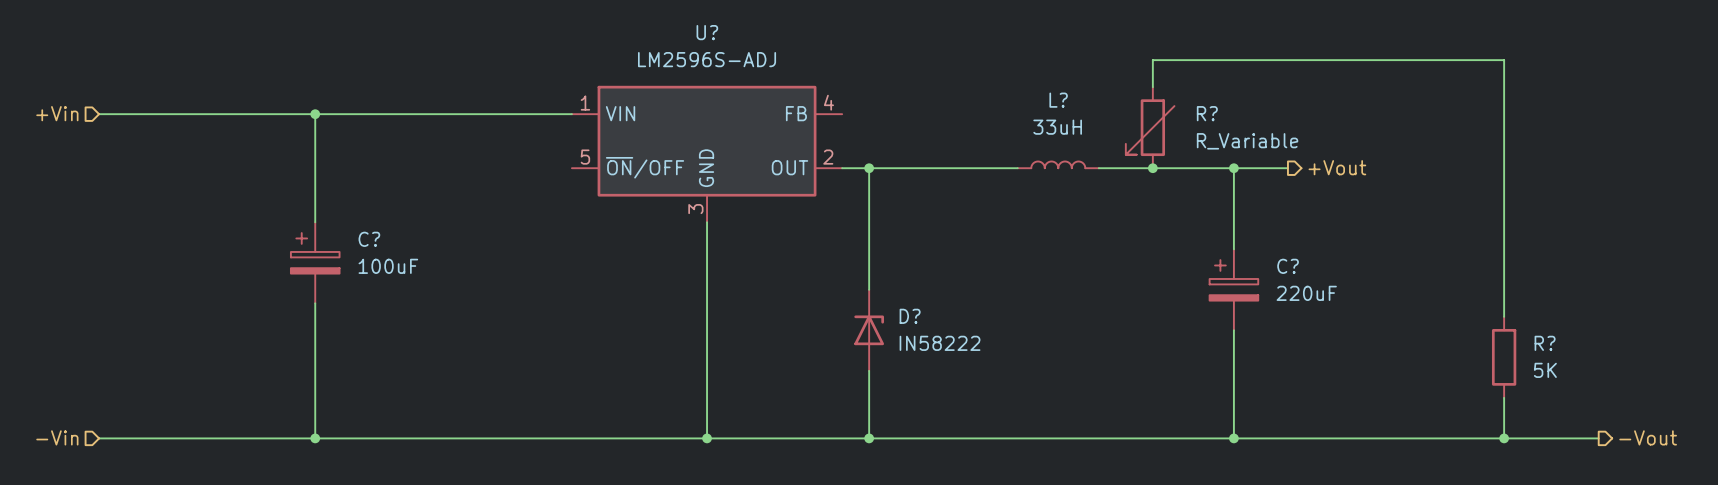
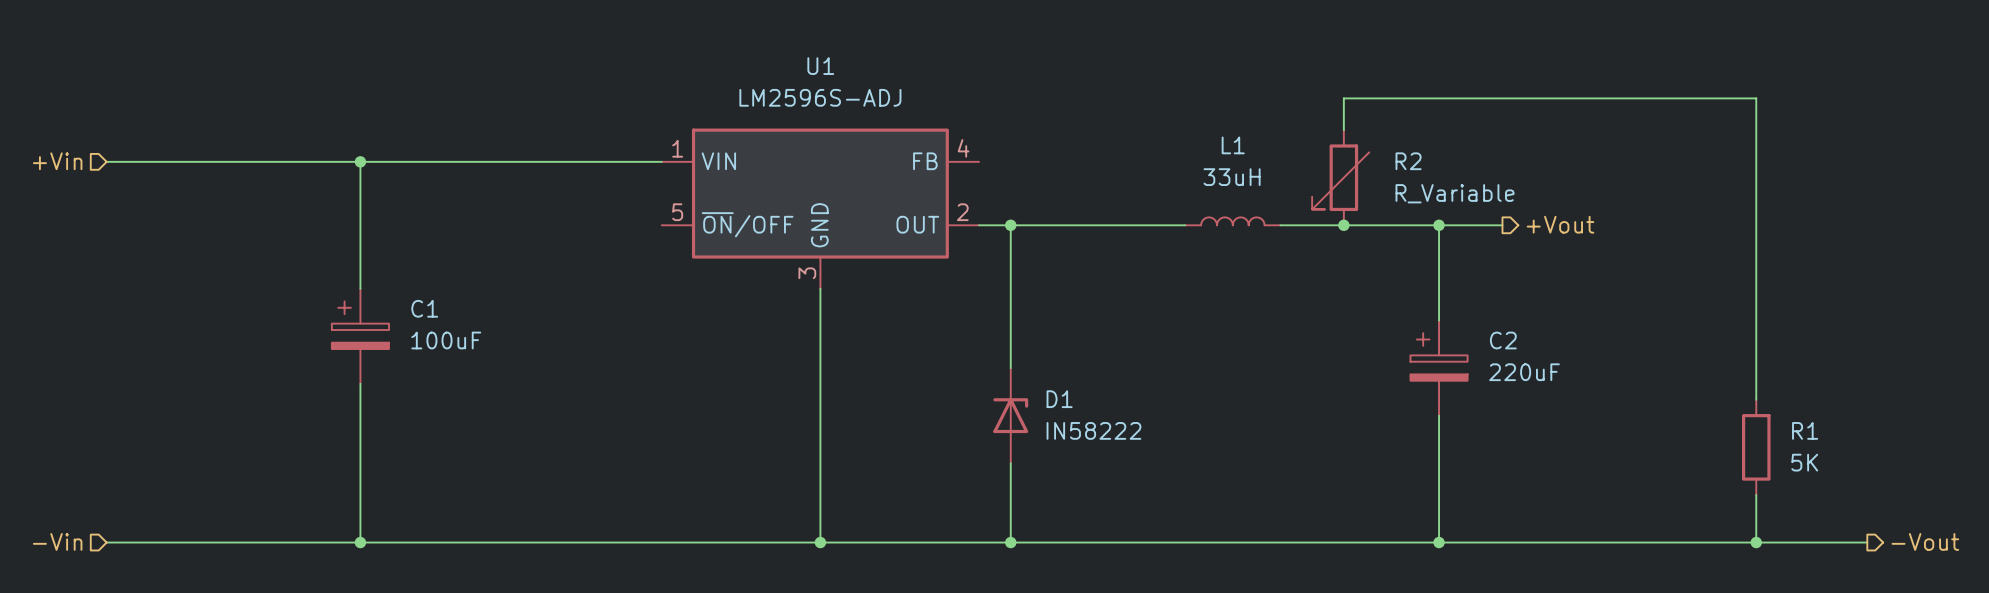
U? name: U? (707, 32) -> U1 (820, 66)
R? name: R? (1207, 113) -> R2 (1408, 161)
L?: 33uH (1058, 164) -> none
L1: none -> 33uH (1232, 221)
C? name: C? (369, 239) -> C1 (424, 308)
C? name: C? (1288, 266) -> C2 (1503, 340)
D? name: D? (910, 316) -> D1 (1059, 399)
R? name: R? (1545, 343) -> R1 (1805, 430)

